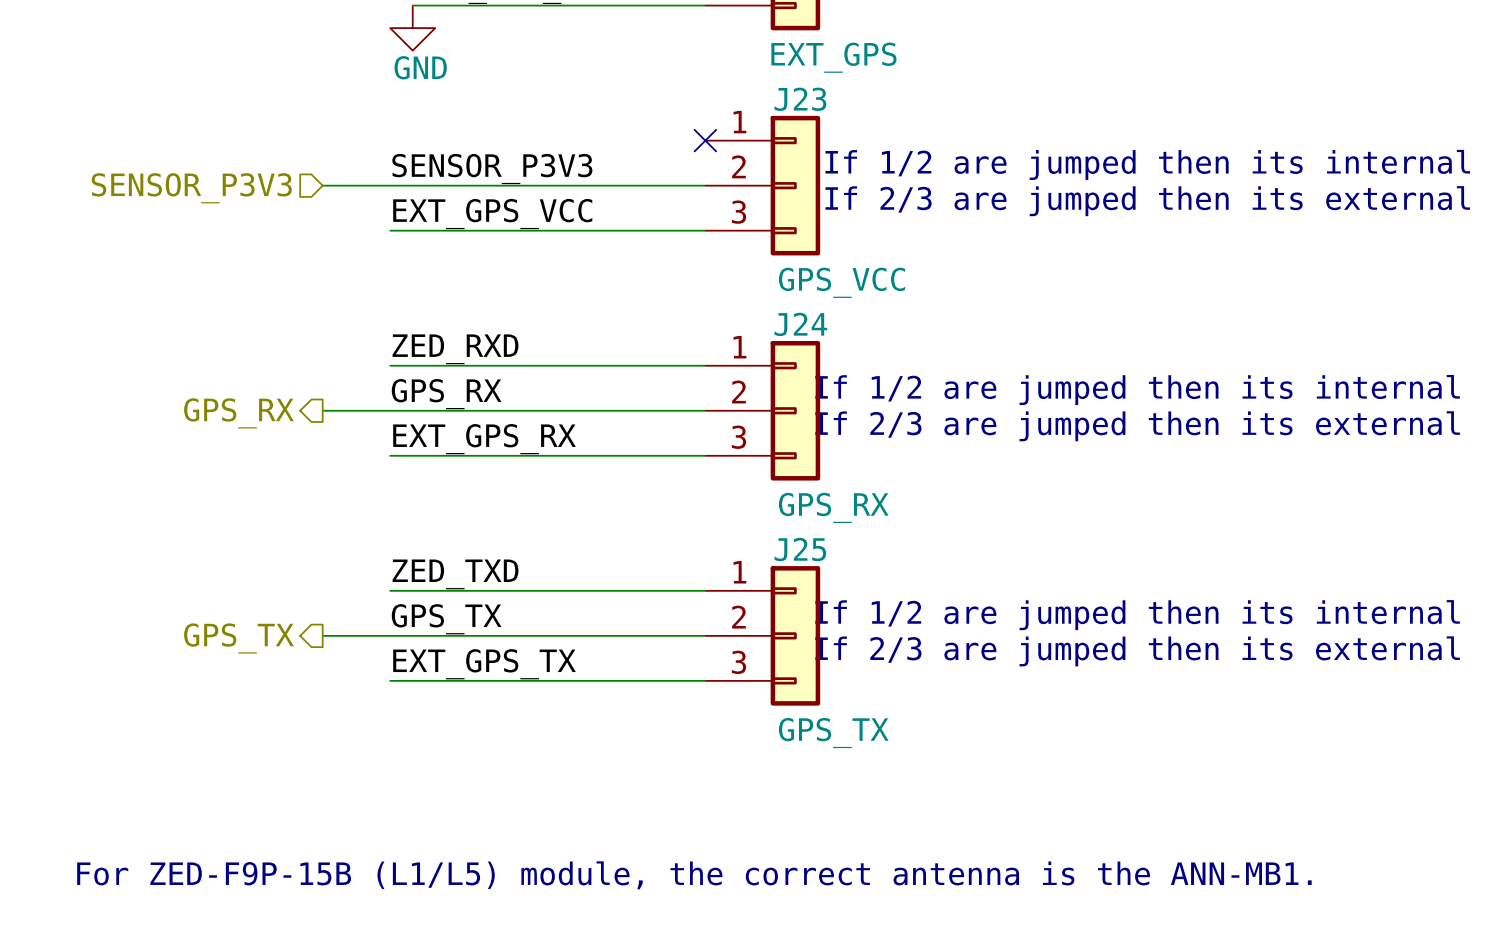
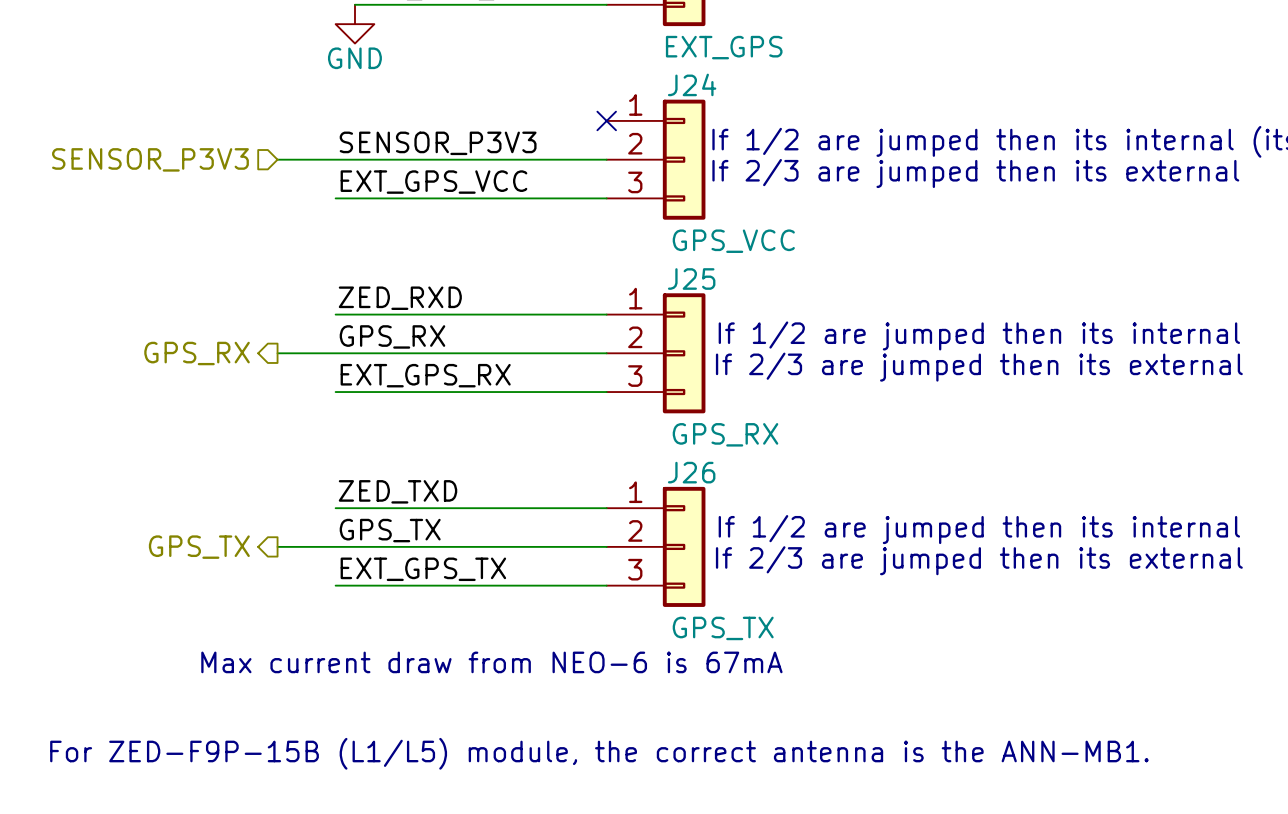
J23 name: J23 (800, 99) -> J24 (692, 84)
J24 name: J24 (800, 324) -> J25 (691, 279)
J25 name: J25 (800, 549) -> J26 (691, 472)
text: none -> Max current draw from NEO-6 is 67mA (491, 662)

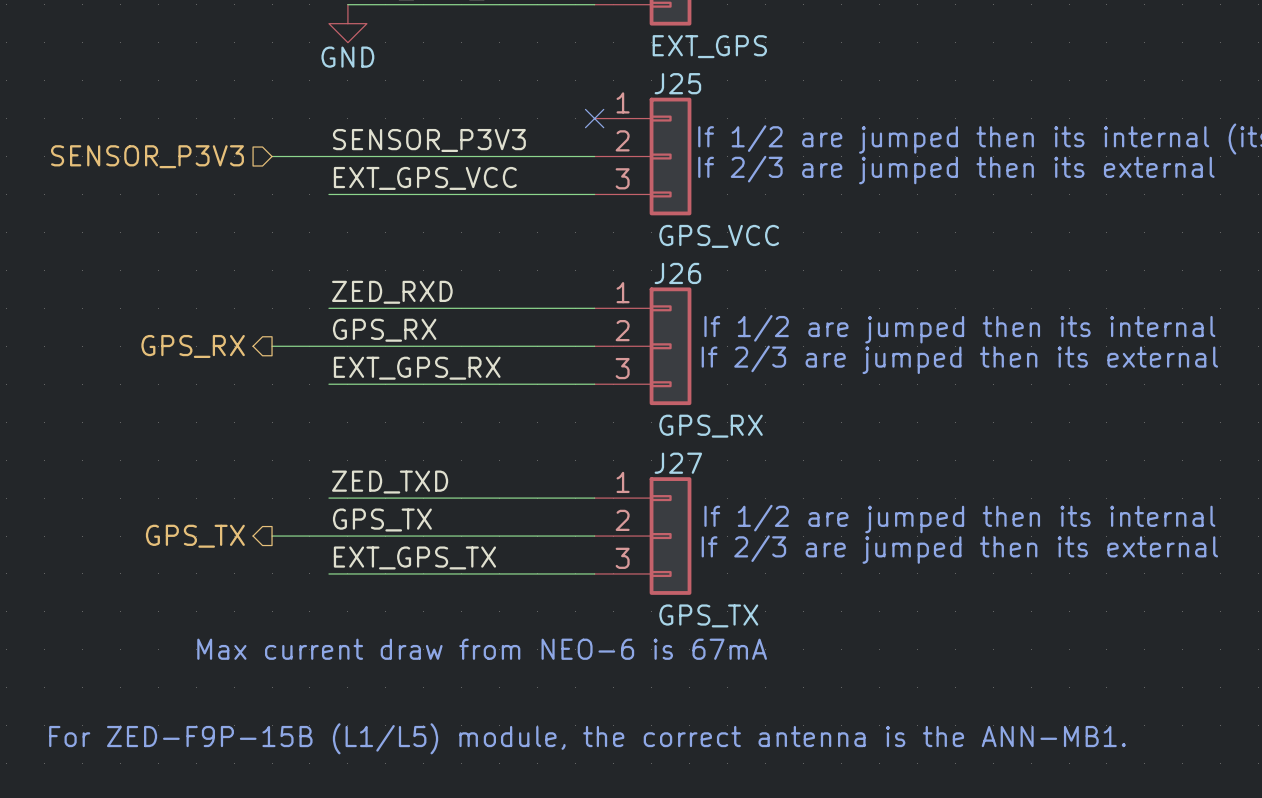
J24 name: J24 (692, 84) -> J25 (677, 83)
J25 name: J25 (691, 279) -> J26 (677, 273)
J26 name: J26 (691, 472) -> J27 (678, 463)

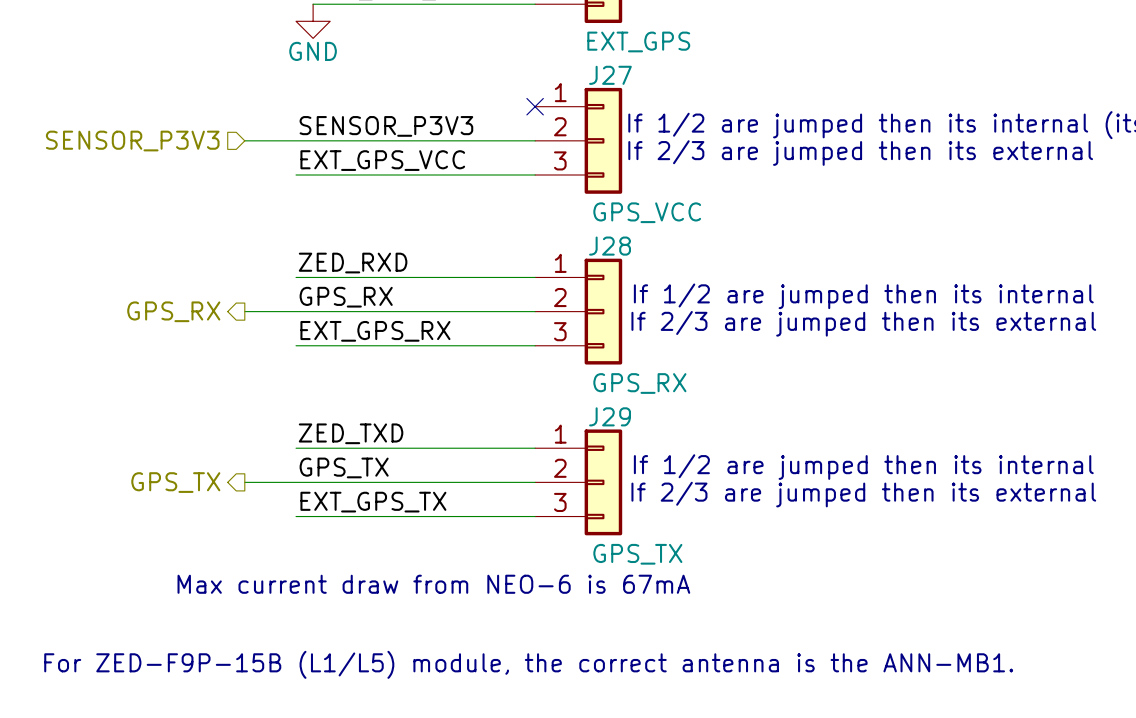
J25 name: J25 (677, 83) -> J27 (610, 75)
J26 name: J26 (677, 273) -> J28 (610, 246)
J27 name: J27 (678, 463) -> J29 (610, 416)

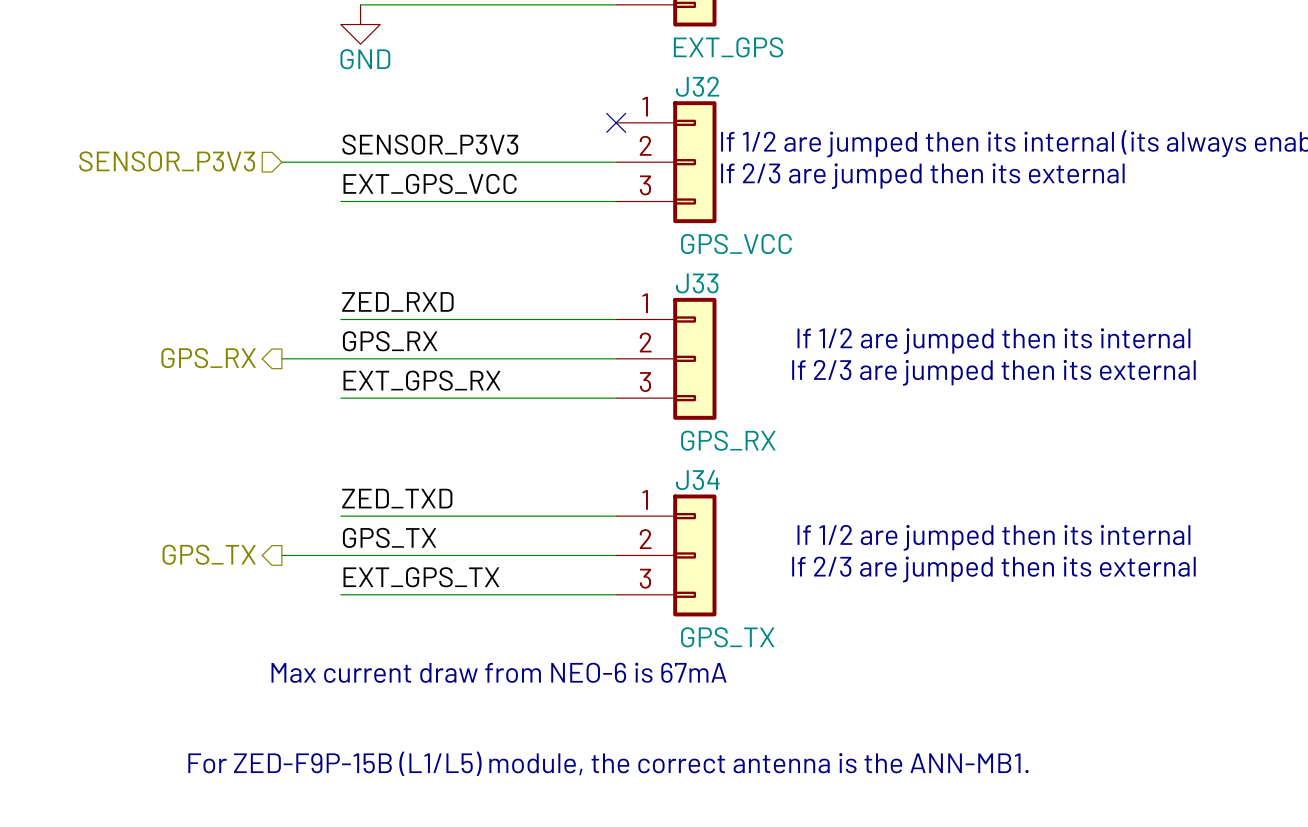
J27 name: J27 (610, 75) -> J32 (697, 86)
J28 name: J28 (610, 246) -> J33 (697, 283)
J29 name: J29 (610, 416) -> J34 (697, 480)

